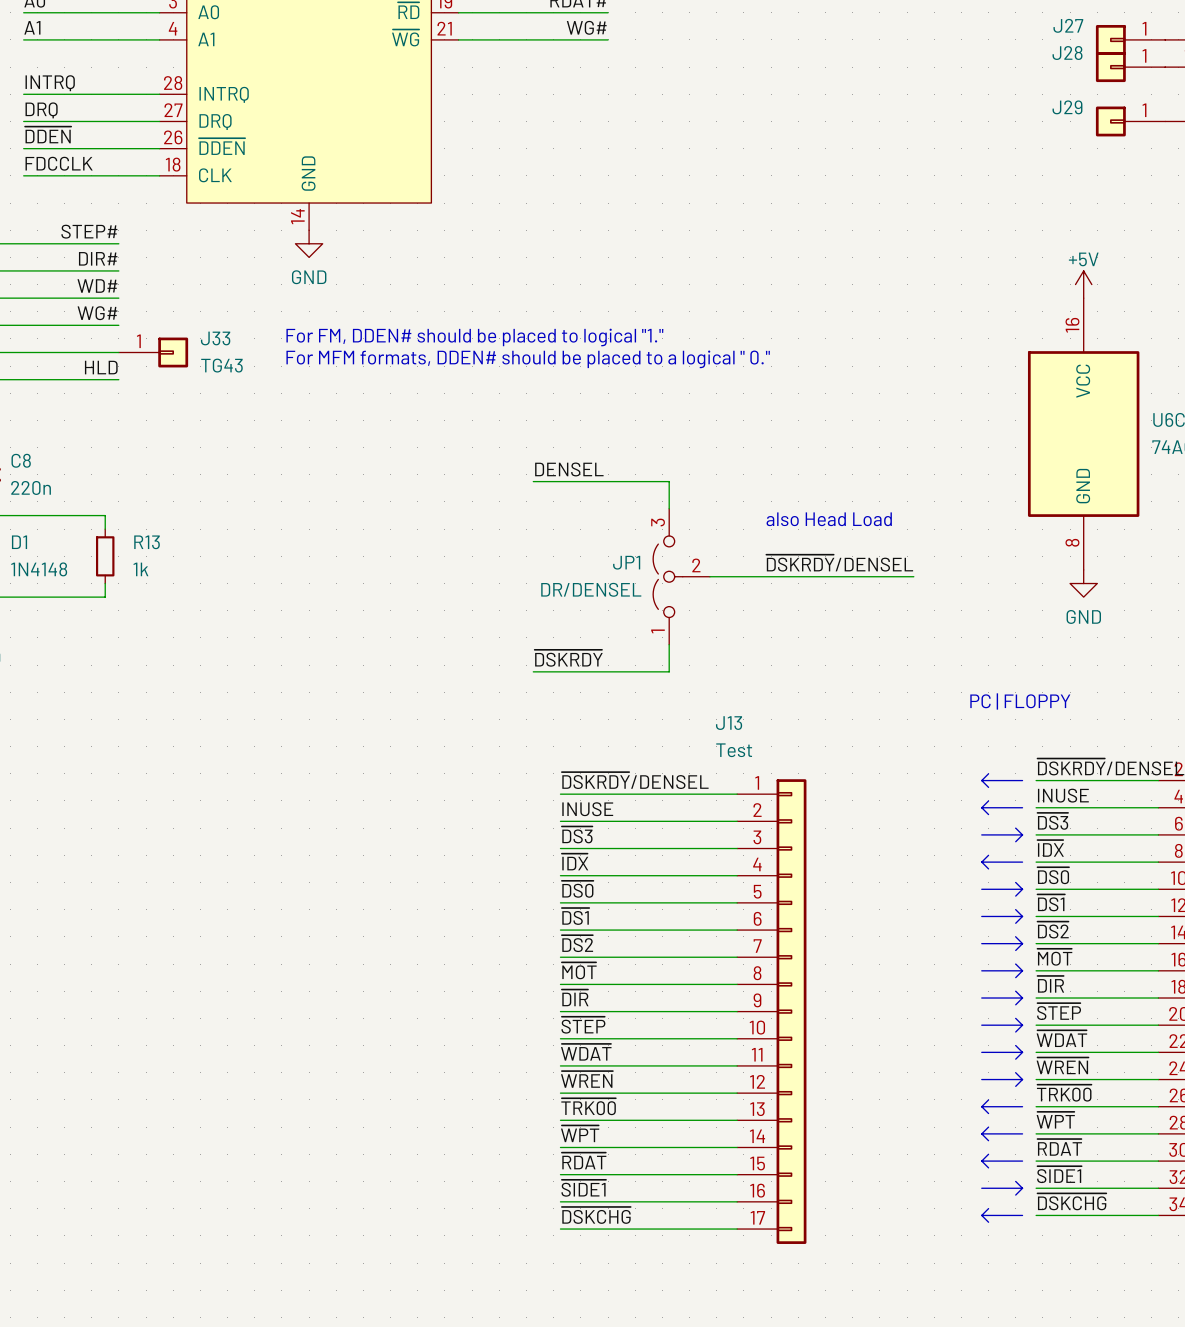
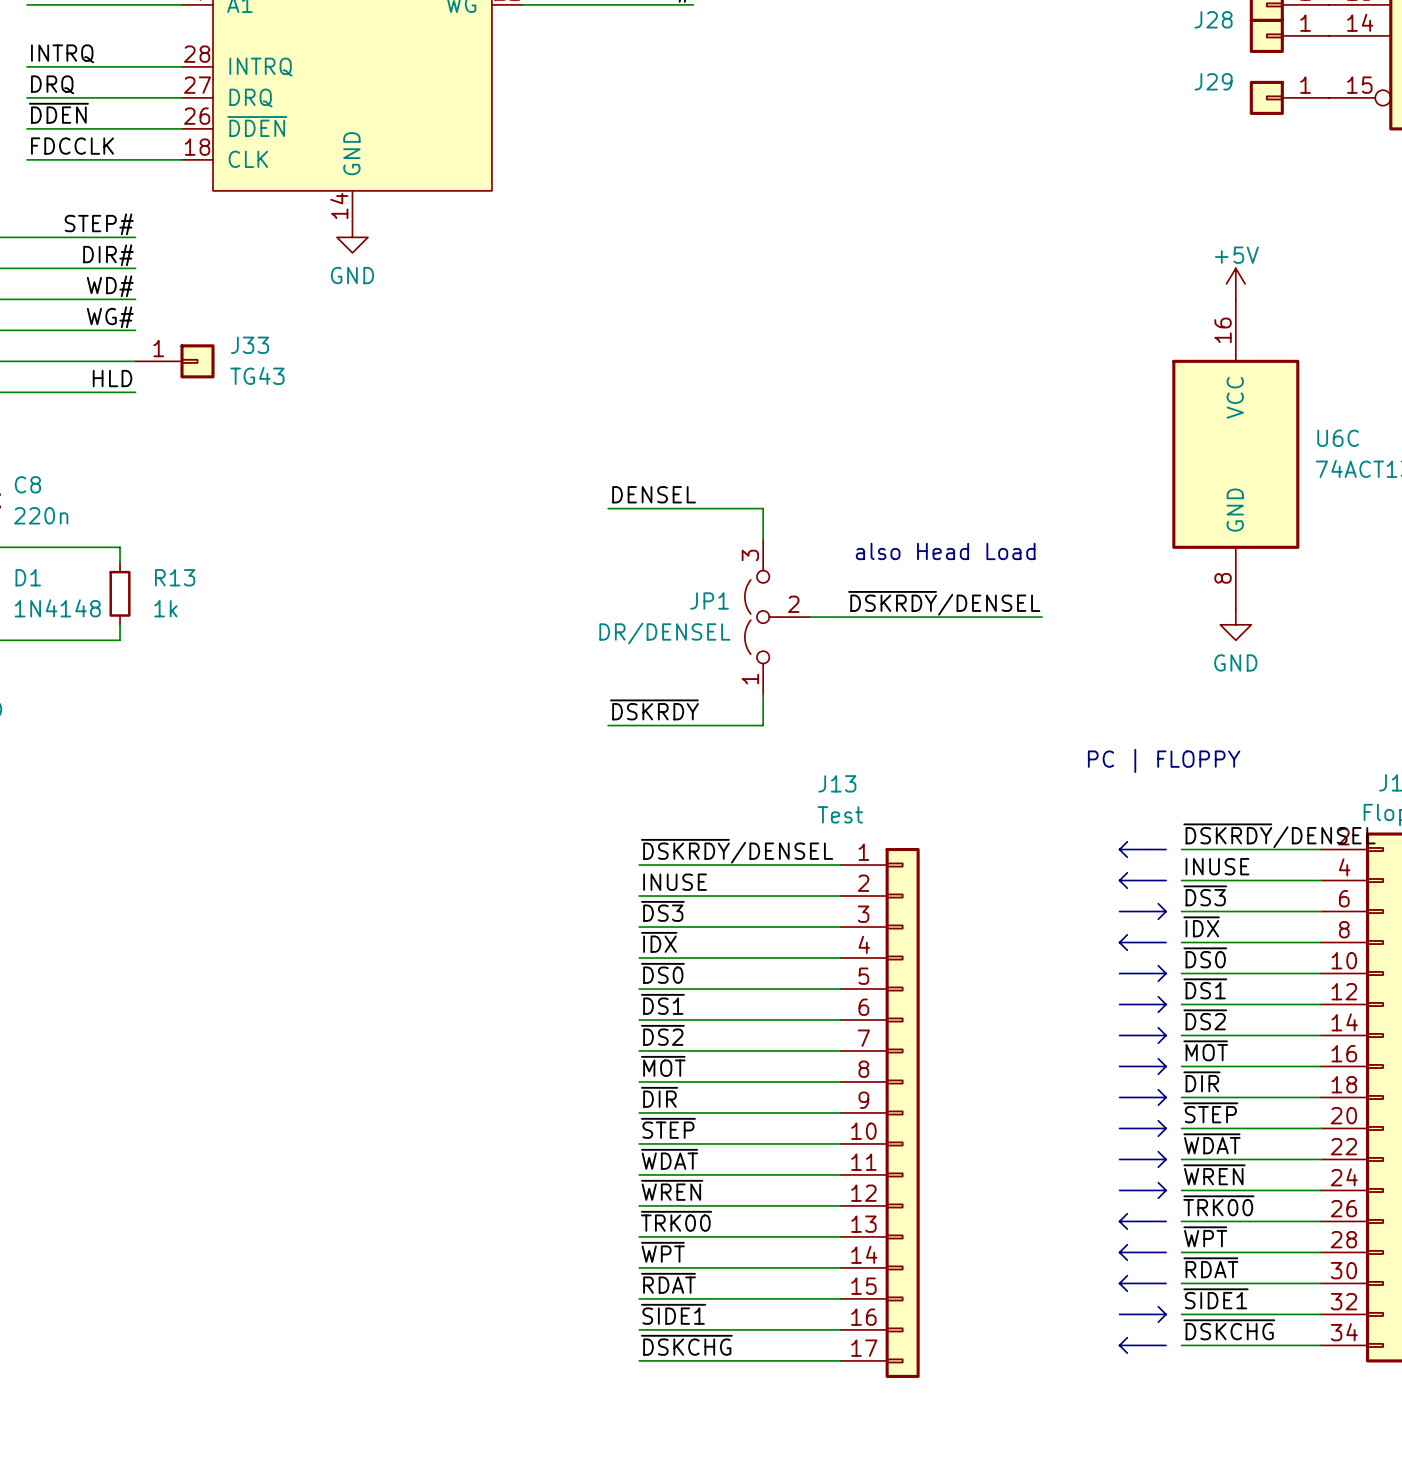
text: For FM, DDEN# should be placed to logical "1." (474, 337) -> none
text: For MFM formats, DDEN# should be placed to a logical " 0." (528, 359) -> none

